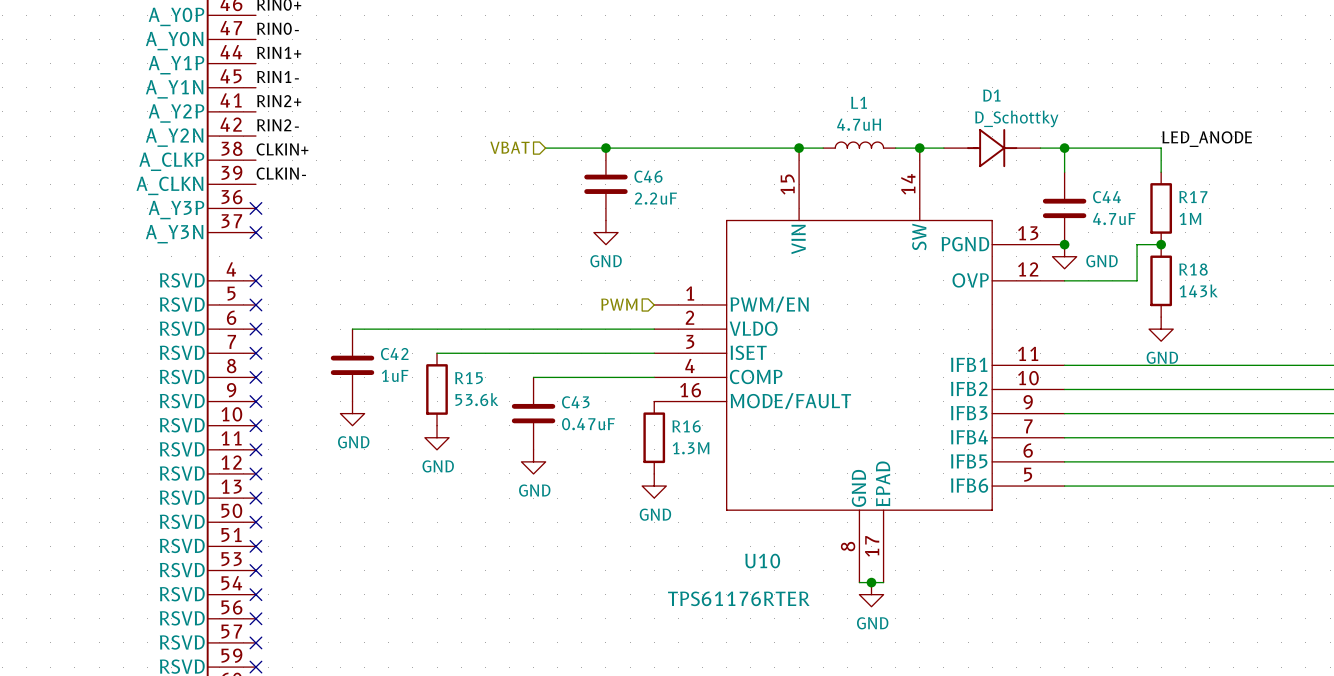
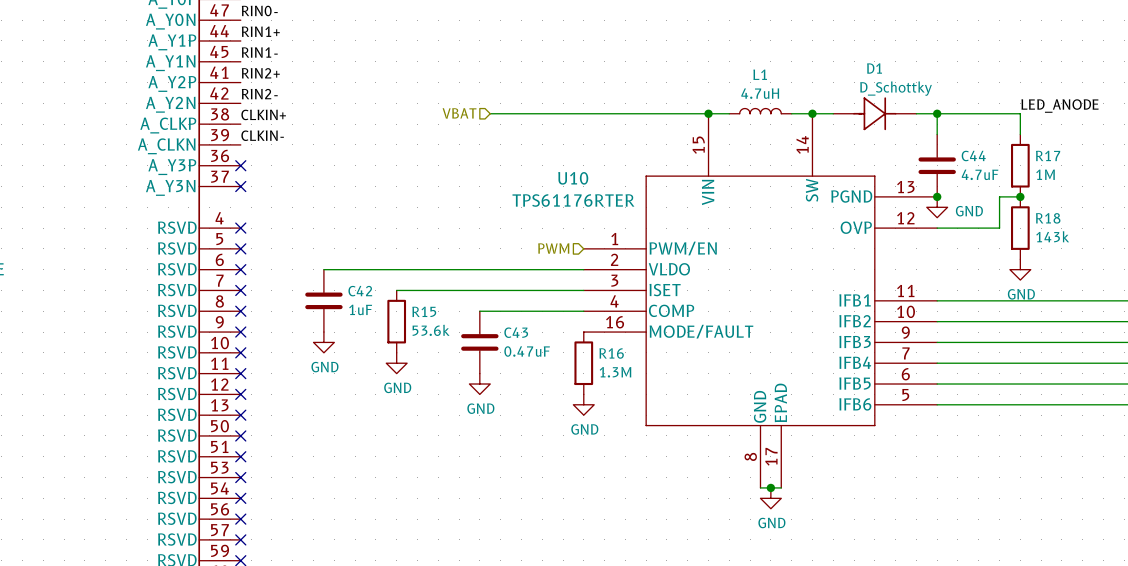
junction: (605, 148) -> none
C46: 2.2uF (605, 184) -> none
power symbol: GND (605, 232) -> none
U10 name position: U10 (762, 561) -> U10 (573, 178)
U10 value position: TPS61176RTER (738, 598) -> TPS61176RTER (573, 200)

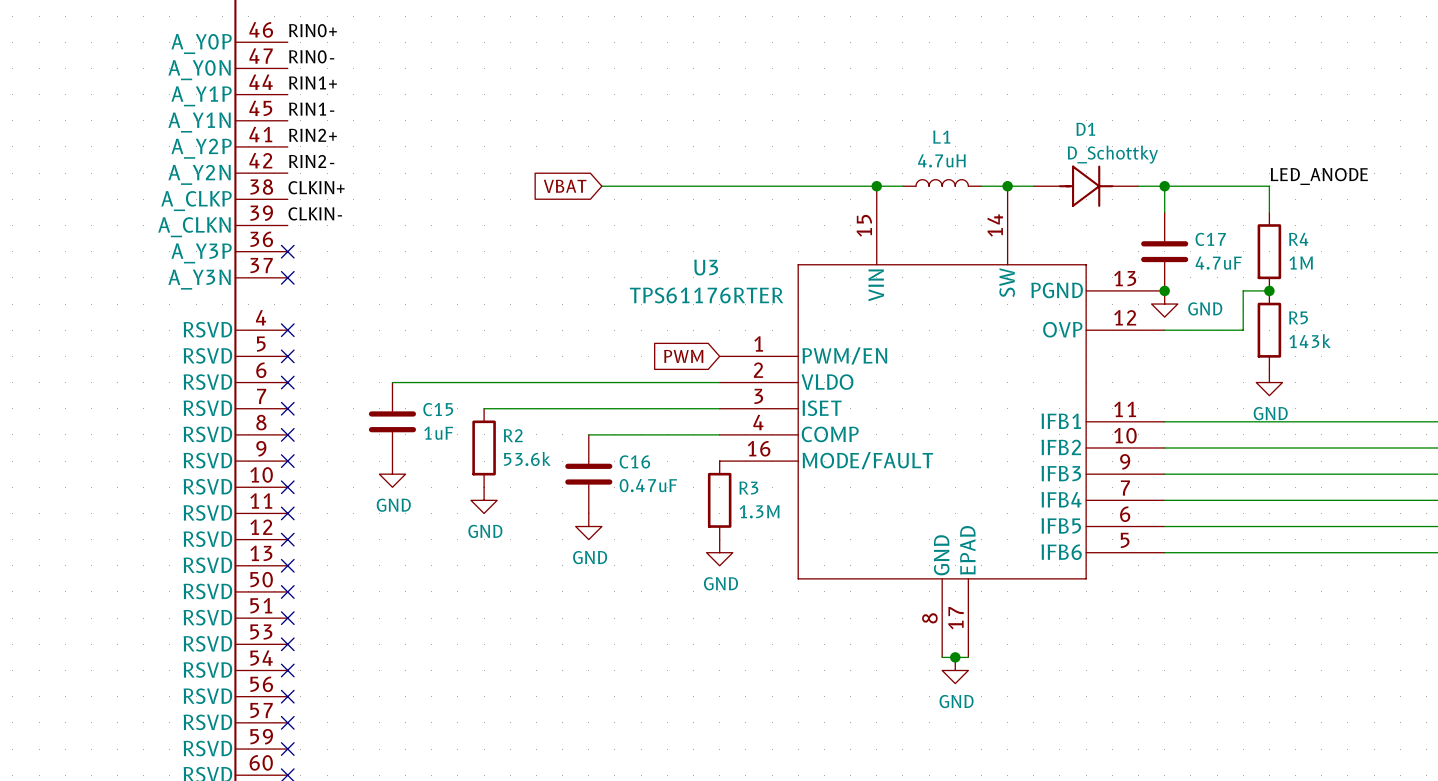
hierarchical label: VBAT (459, 113) -> none
global label: none -> VBAT (565, 186)
C44 name: C44 (973, 155) -> C17 (1210, 239)
R17 name: R17 (1048, 155) -> R4 (1298, 239)
U10 name: U10 (573, 178) -> U3 (706, 267)
R18 name: R18 (1048, 218) -> R5 (1298, 317)
hierarchical label: PWM (553, 248) -> none
global label: none -> PWM (683, 356)
C42 name: C42 (360, 291) -> C15 (438, 409)
R15 name: R15 (424, 311) -> R2 (513, 435)
C43 name: C43 (516, 332) -> C16 (634, 461)
R16 name: R16 (611, 353) -> R3 (748, 488)

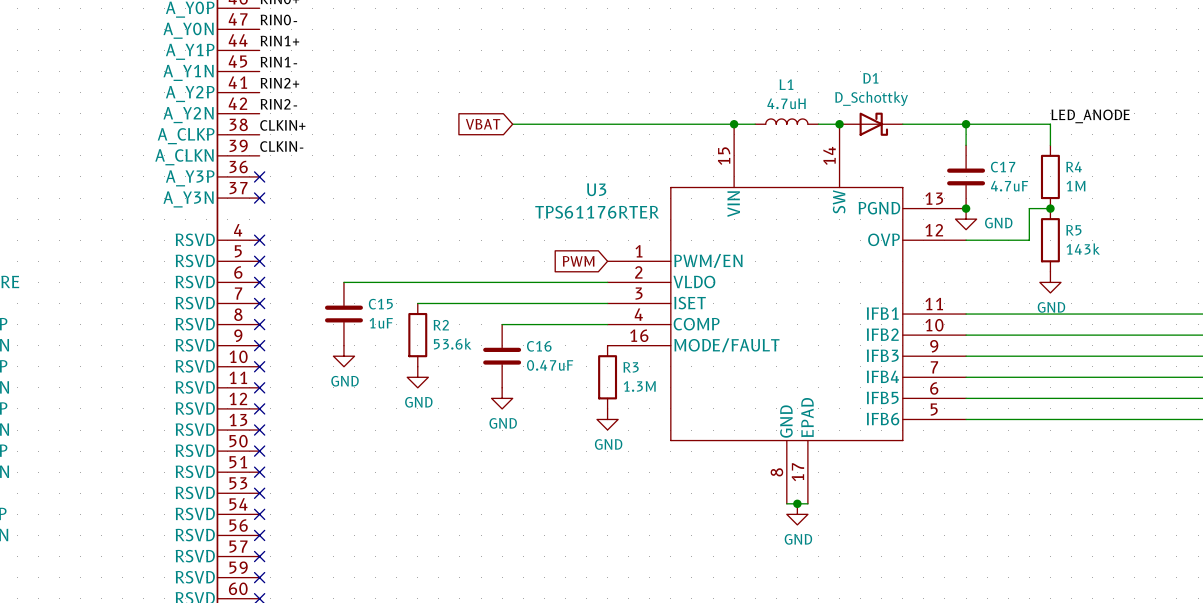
D1 value position: D_Schottky (1112, 154) -> D_Schottky (871, 98)
D1 symbol: [1033, 165, 1139, 207] -> [839, 112, 903, 136]

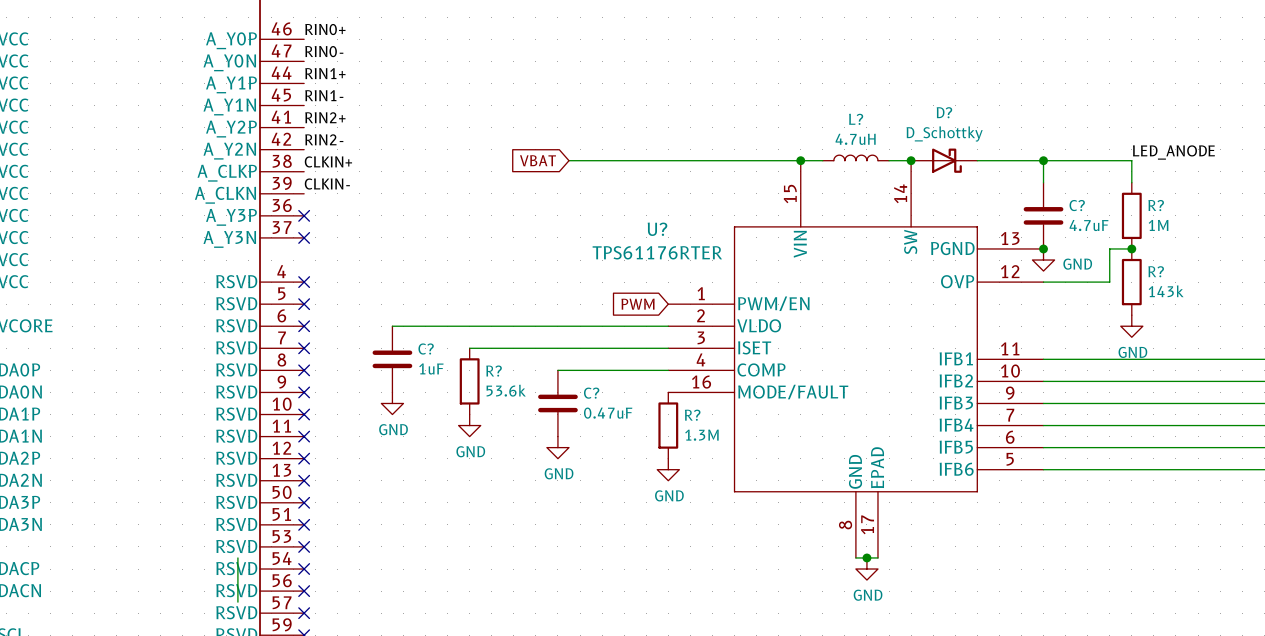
D1 name: D1 (870, 78) -> D? (944, 112)
L1 name: L1 (786, 84) -> L? (856, 119)
C17 name: C17 (1003, 167) -> C? (1077, 205)
R4 name: R4 (1074, 167) -> R? (1156, 205)
U3 name: U3 (596, 189) -> U? (657, 229)
R5 name: R5 (1073, 230) -> R? (1156, 271)
C15 name: C15 (380, 304) -> C? (426, 349)
R2 name: R2 (441, 325) -> R? (494, 371)
C16 name: C16 (539, 346) -> C? (591, 393)
R3 name: R3 (631, 367) -> R? (692, 415)
wire: none -> (237, 557) (237, 602)

